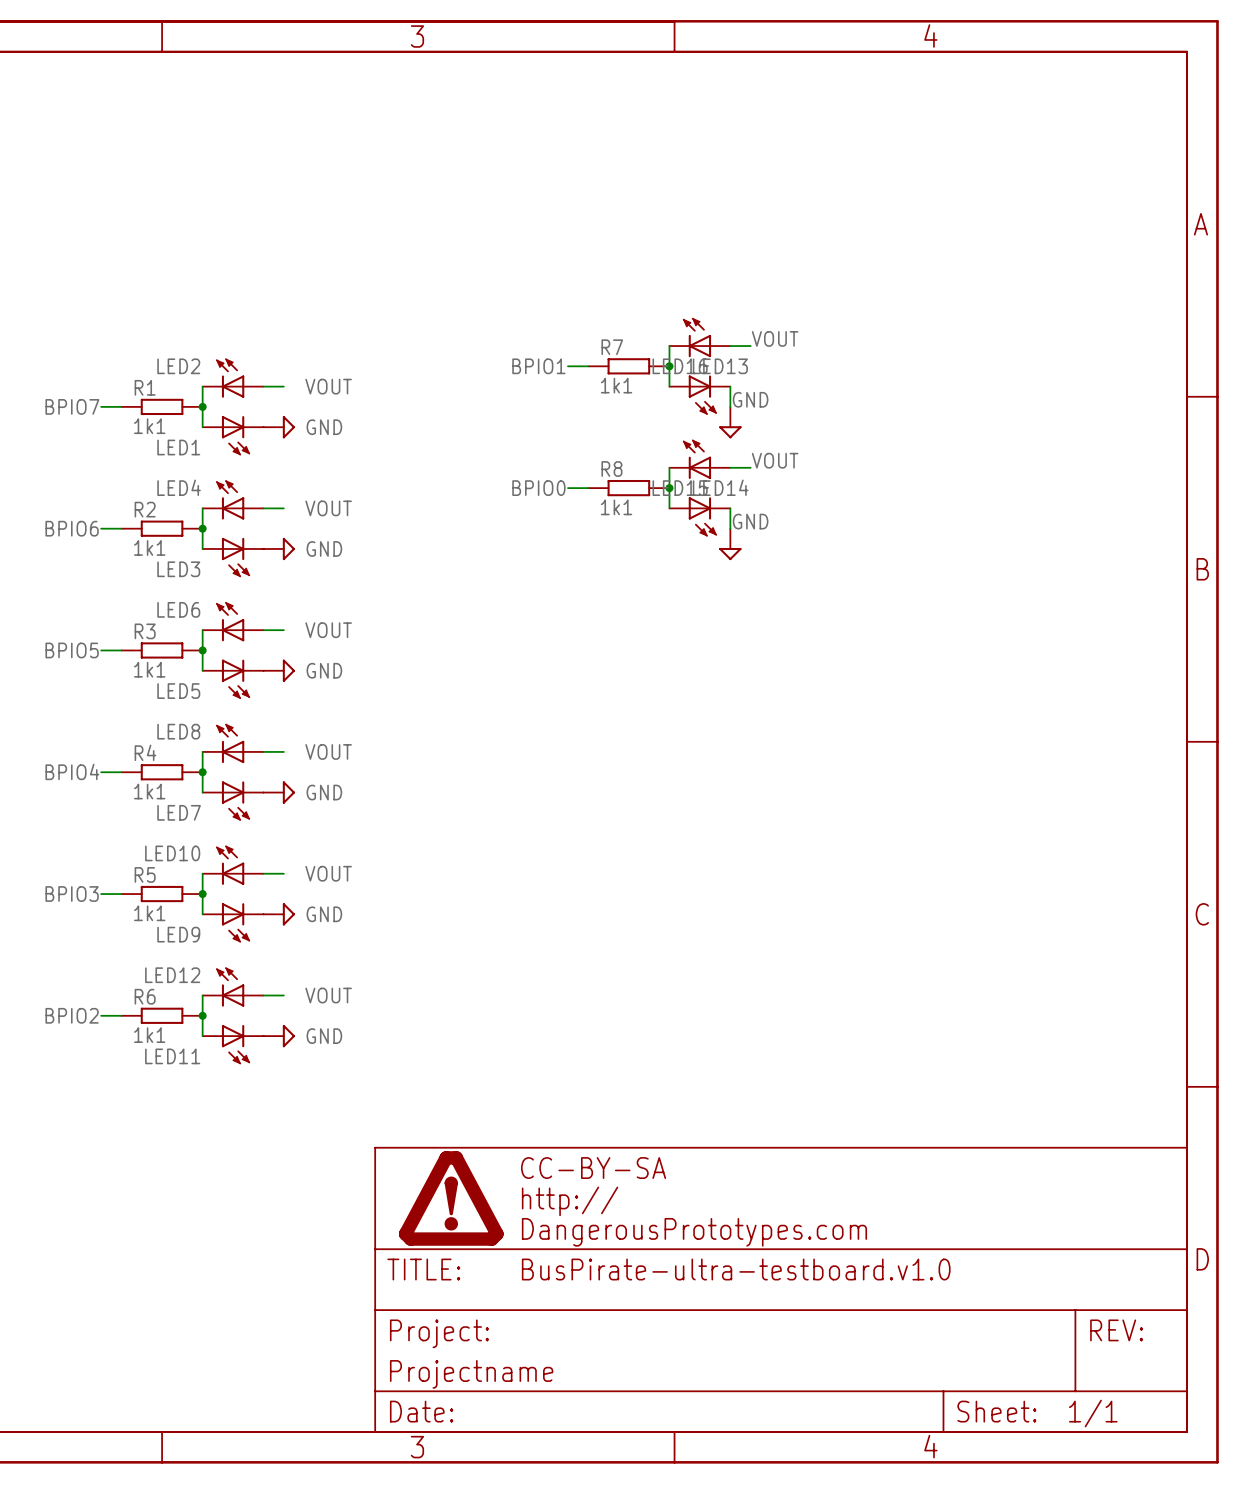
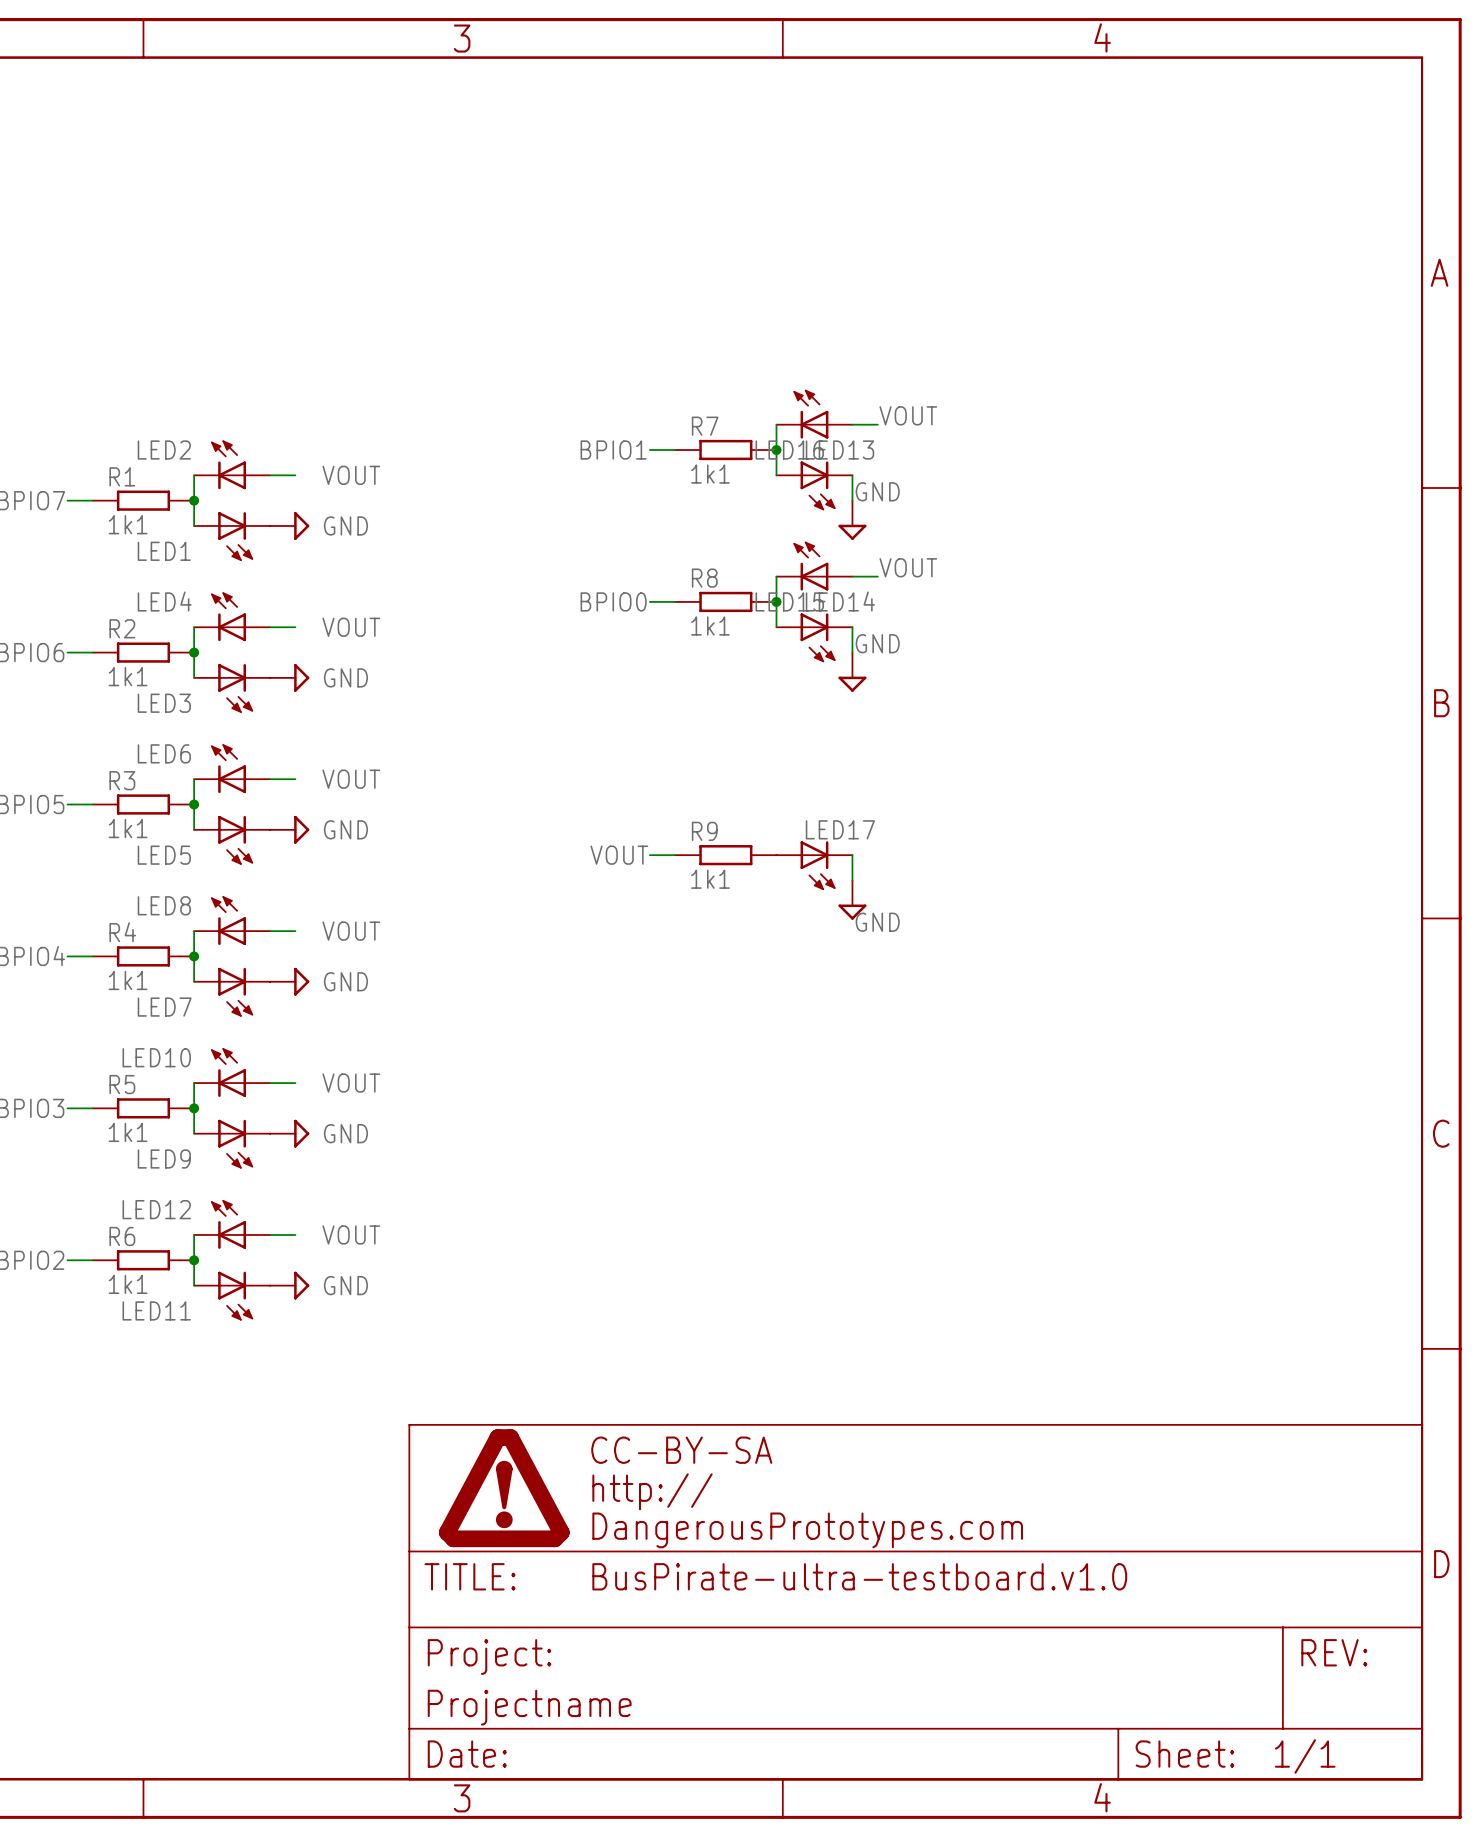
label: none -> VOUT (619, 855)
wire: none -> (649, 855) (675, 855)
R9: none -> 1k1 (725, 855)
wire: none -> (852, 855) (852, 880)
LED17: none -> (814, 865)
power symbol: none -> (852, 900)
label: none -> GND (877, 922)

